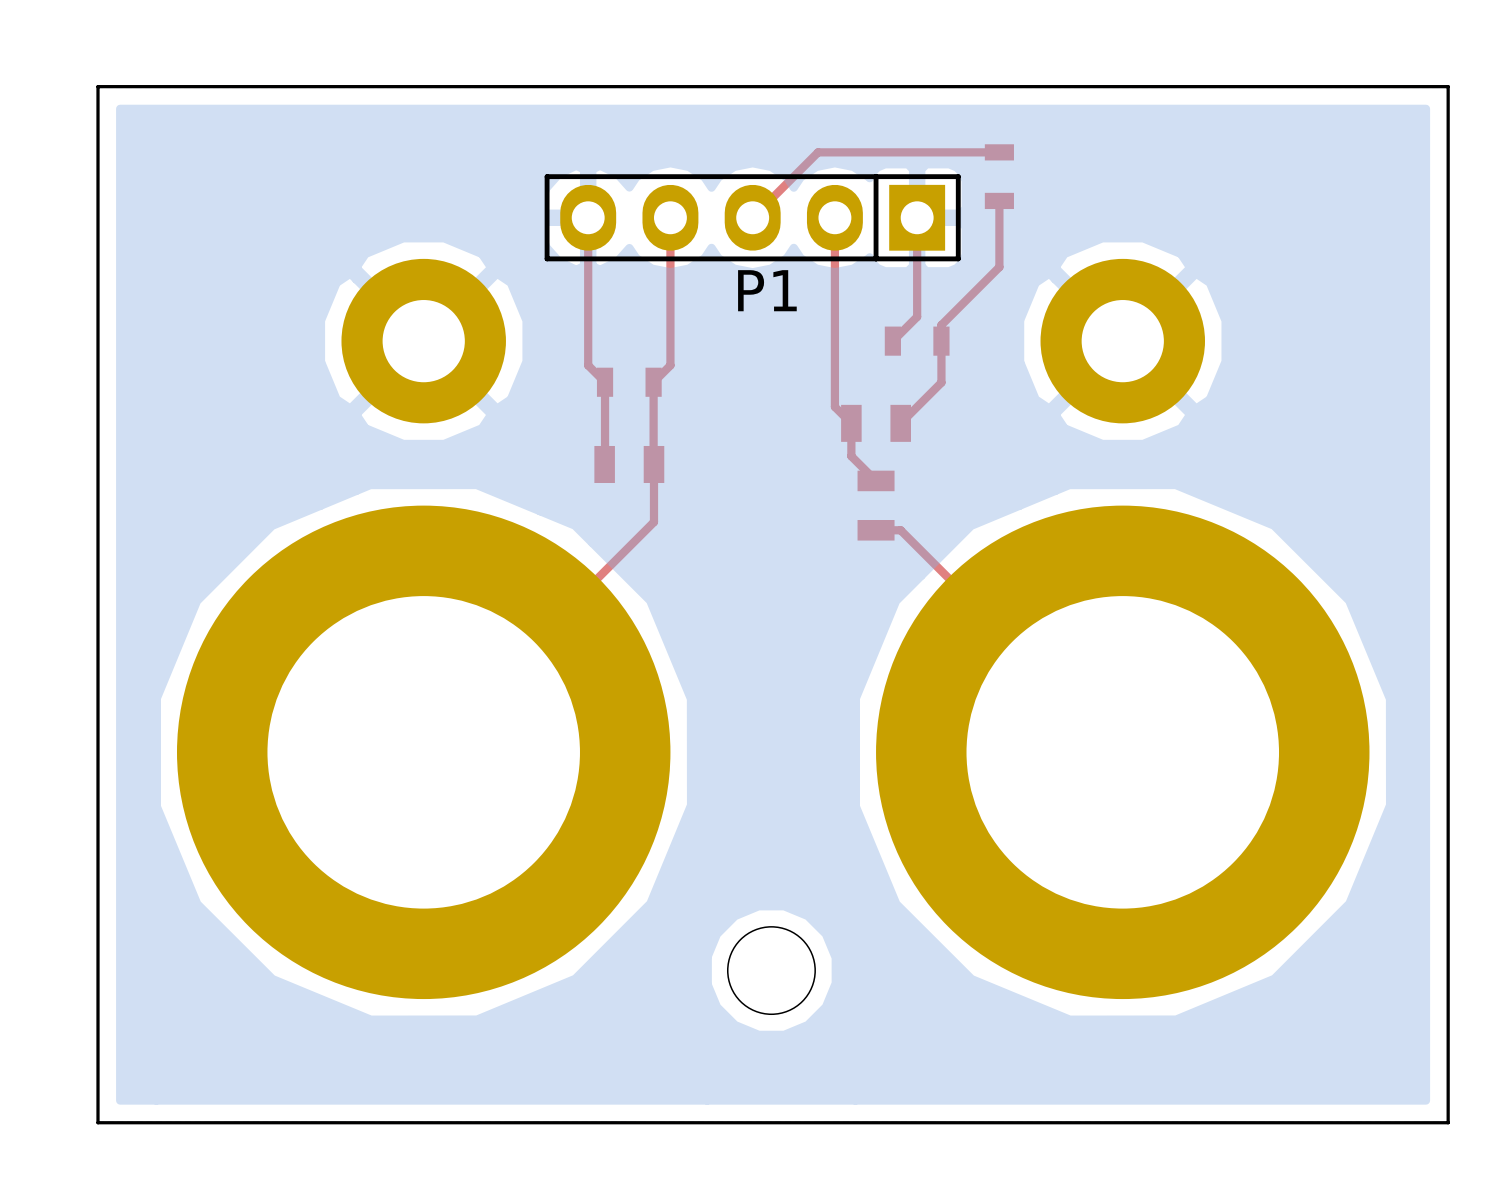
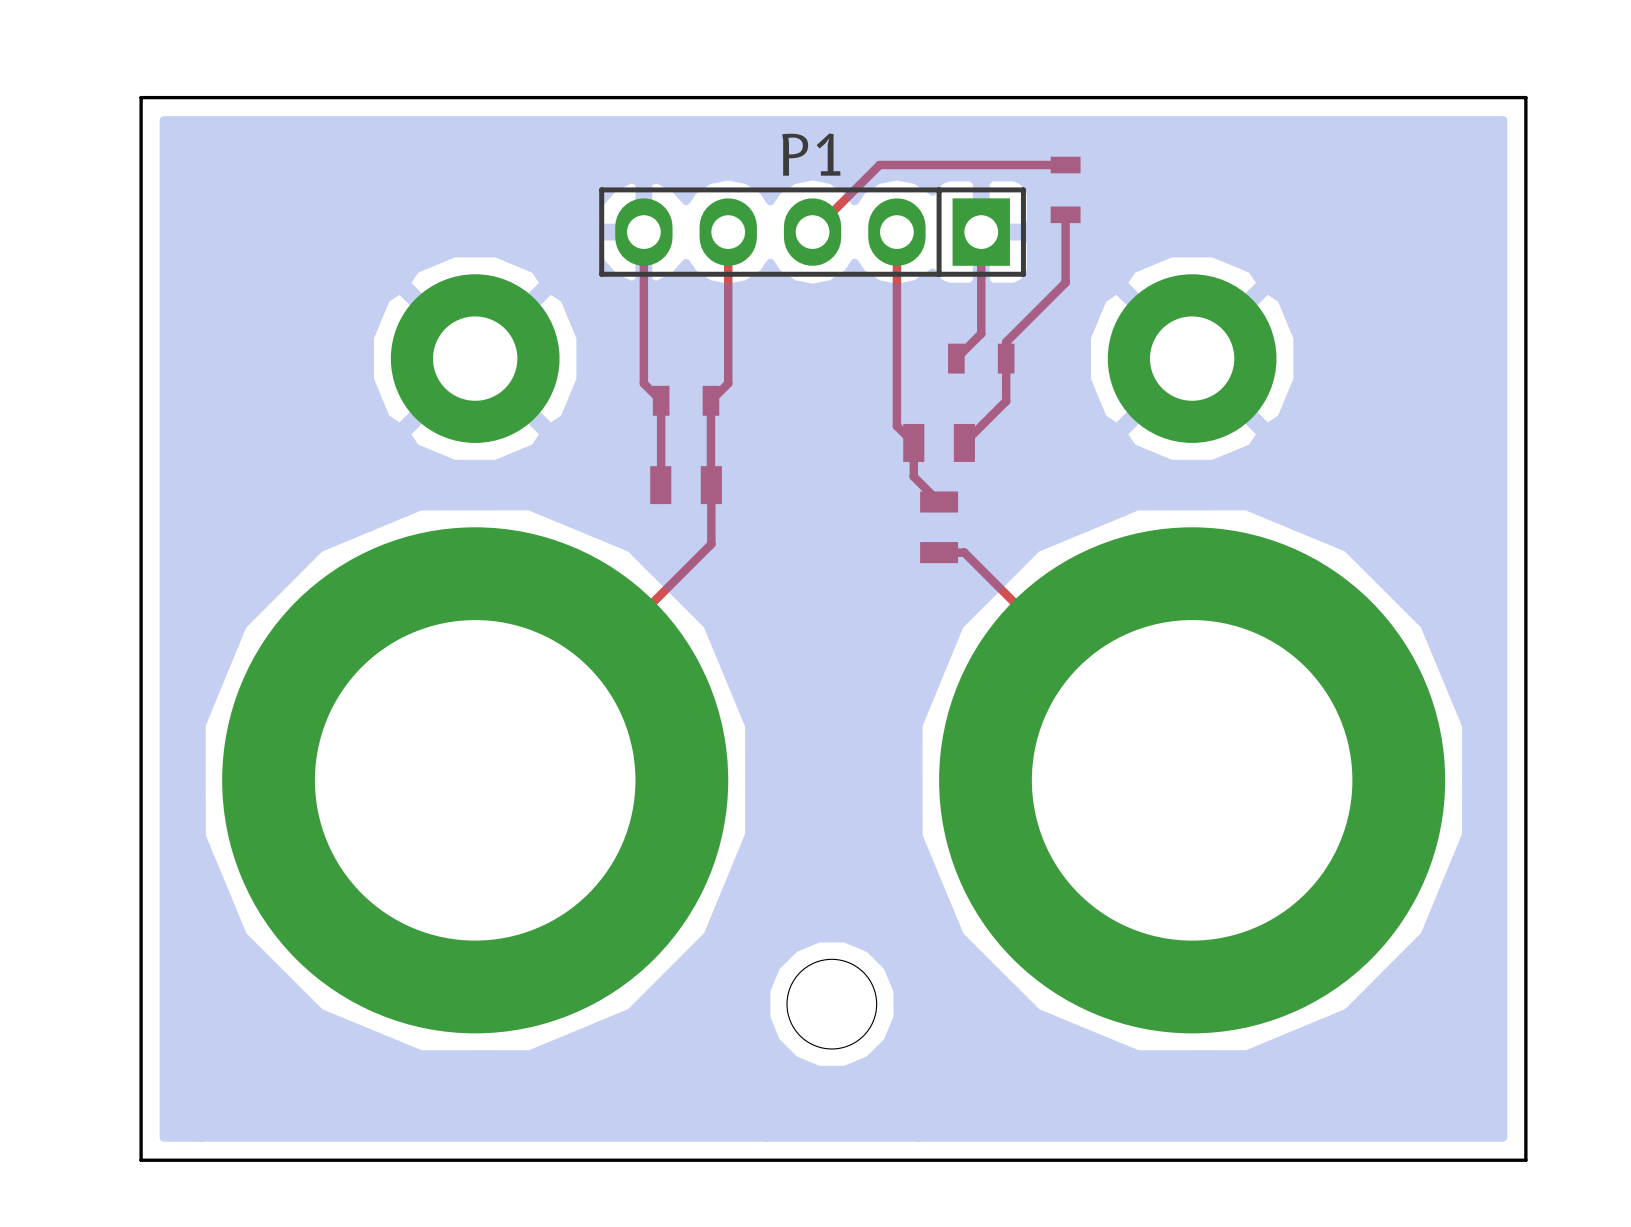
P1 name position: P1 (767, 290) -> P1 (811, 154)

